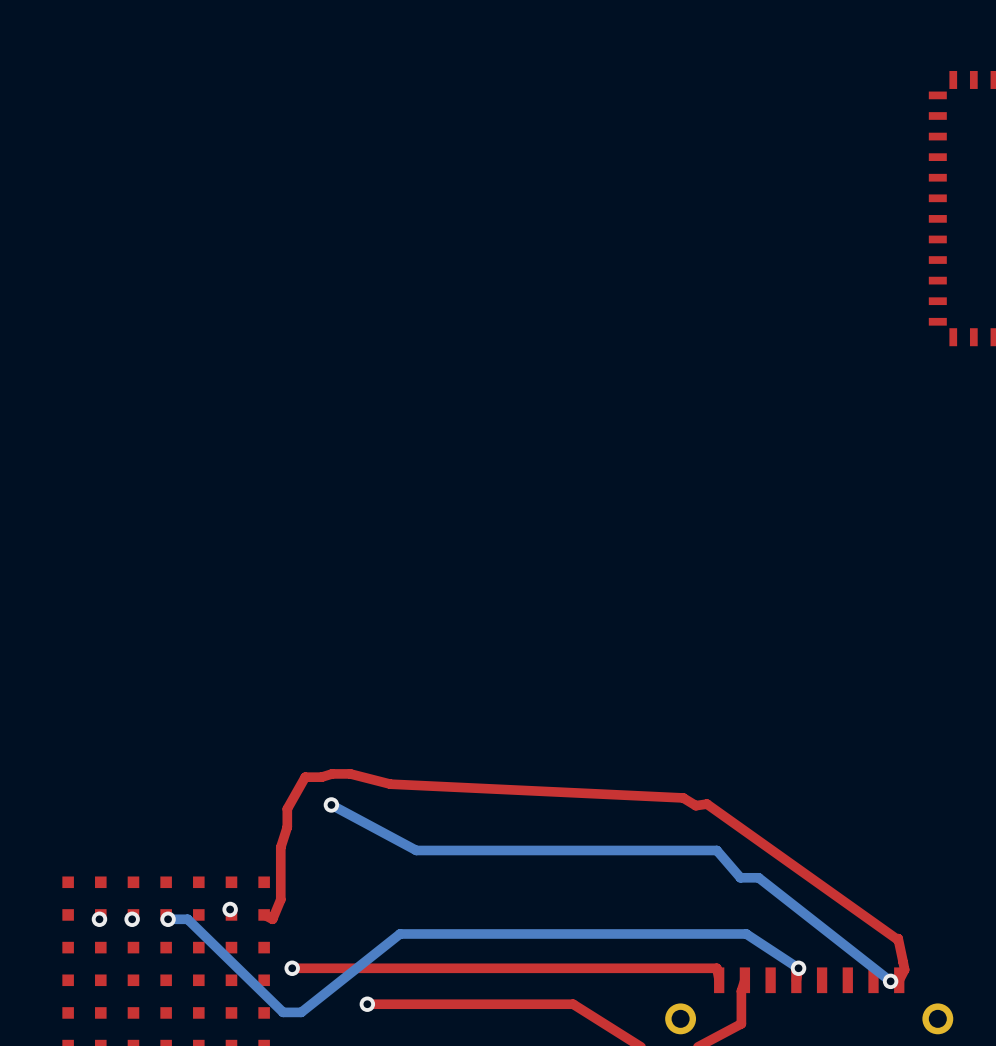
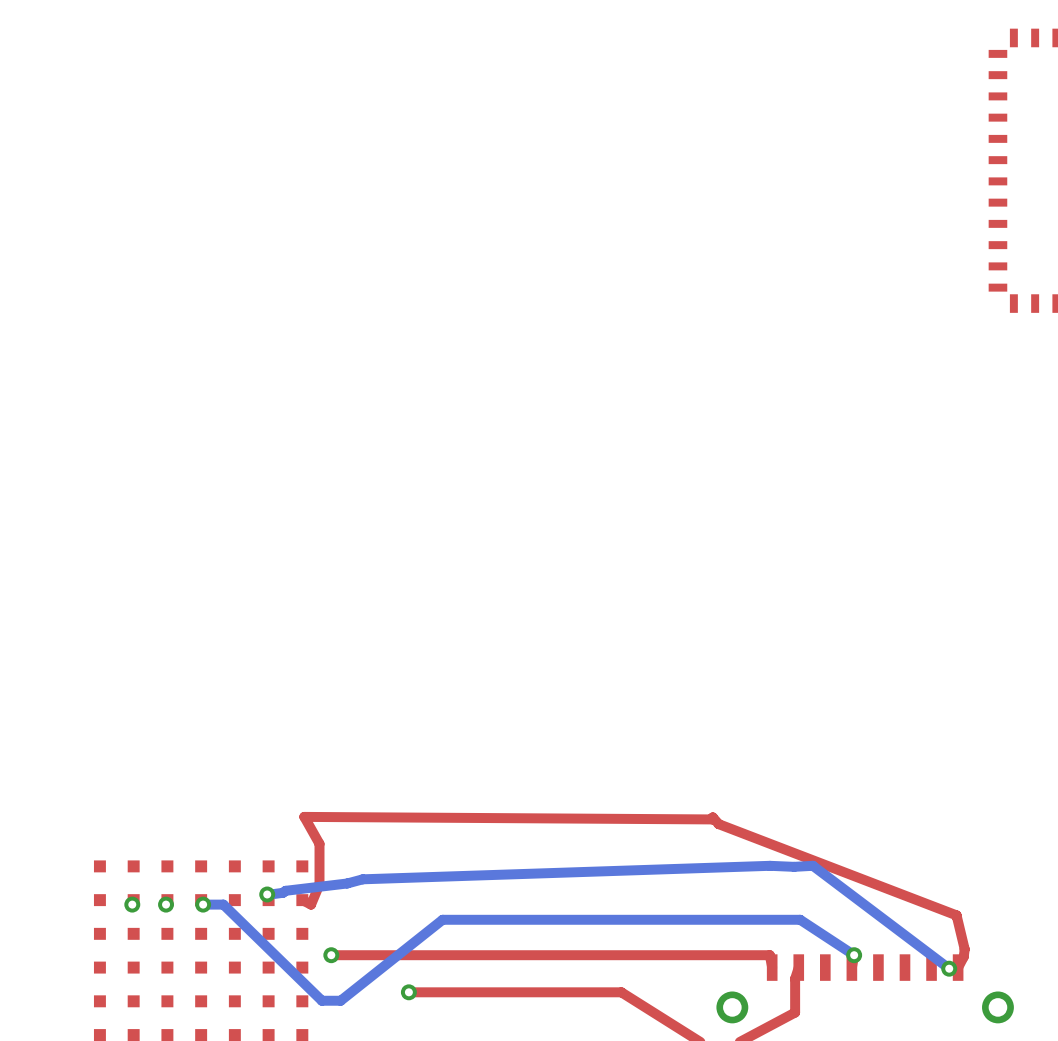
bottom track: (331, 804) (416, 850) (716, 850) (740, 877) (758, 877) (890, 981) -> (270, 894) (285, 890) (347, 883) (362, 879) (812, 865) (949, 968)
via: (331, 804) -> none
top track: (280, 860) (280, 847) (287, 827) (287, 808) (305, 777) (350, 773) (390, 784) (683, 797) (695, 805) (706, 804) (898, 938) (904, 969) (899, 980) -> (319, 843) (304, 816) (712, 819) (712, 817) (718, 824) (956, 915) (964, 949) (963, 956) (958, 967)

